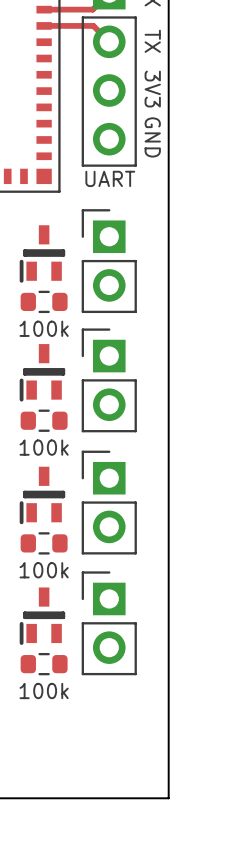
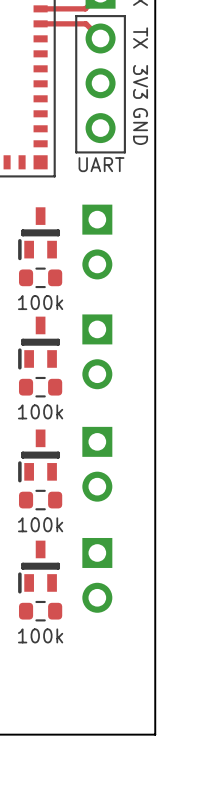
part side: top (109, 261) -> bottom (97, 242)
part side: top (109, 380) -> bottom (97, 351)
part side: top (109, 502) -> bottom (97, 464)
part side: top (109, 623) -> bottom (97, 575)

